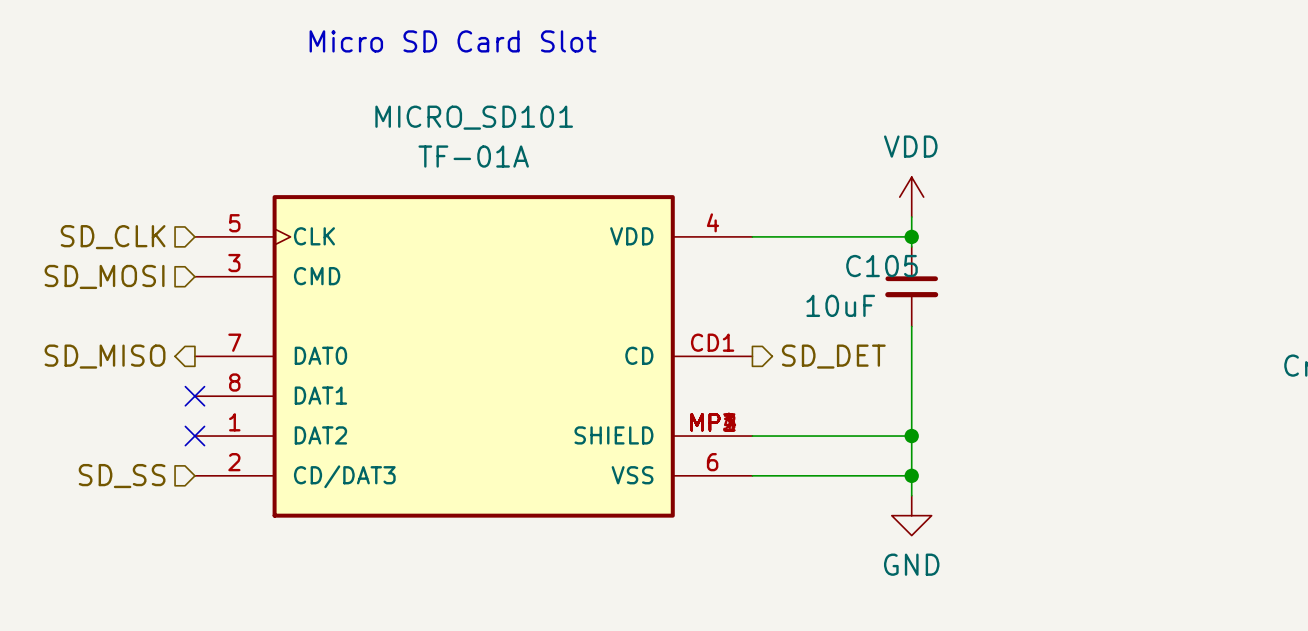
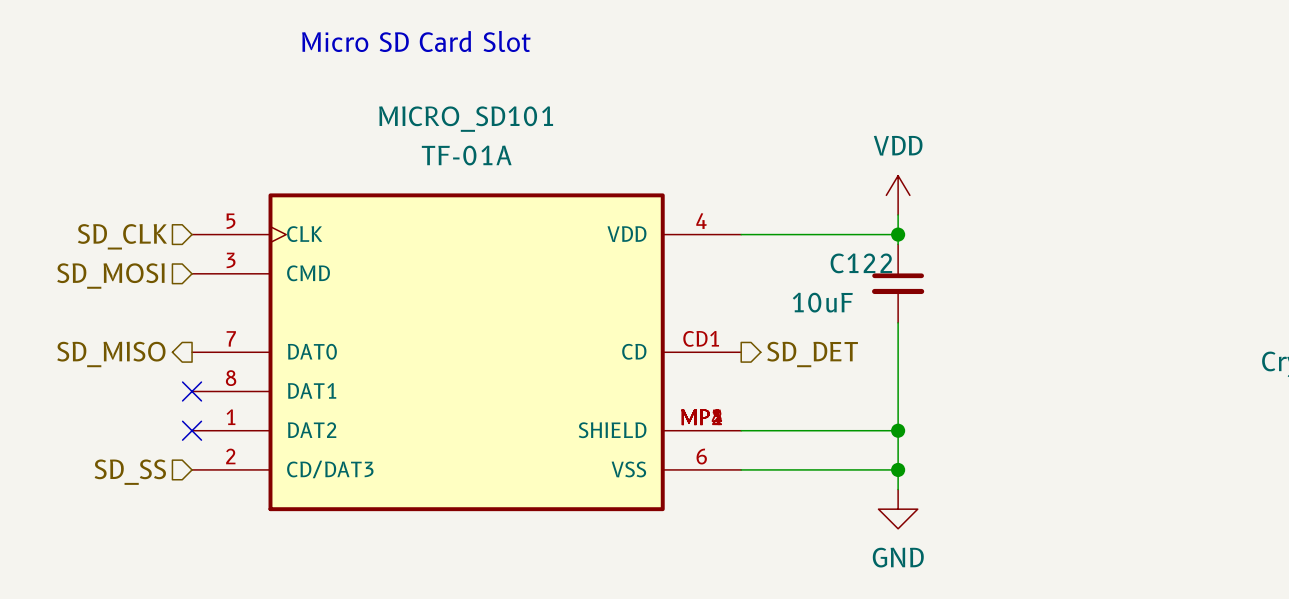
C105 name: C105 (882, 266) -> C122 (861, 263)

